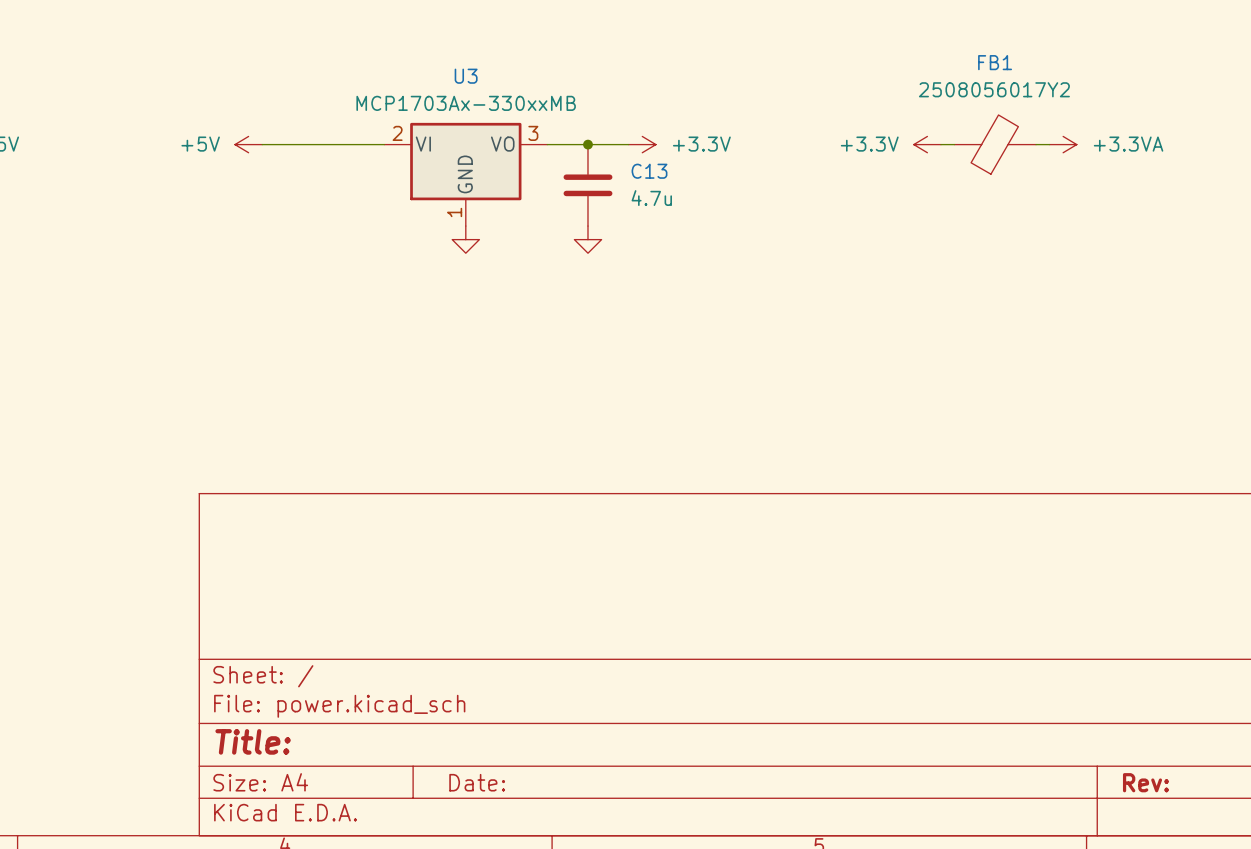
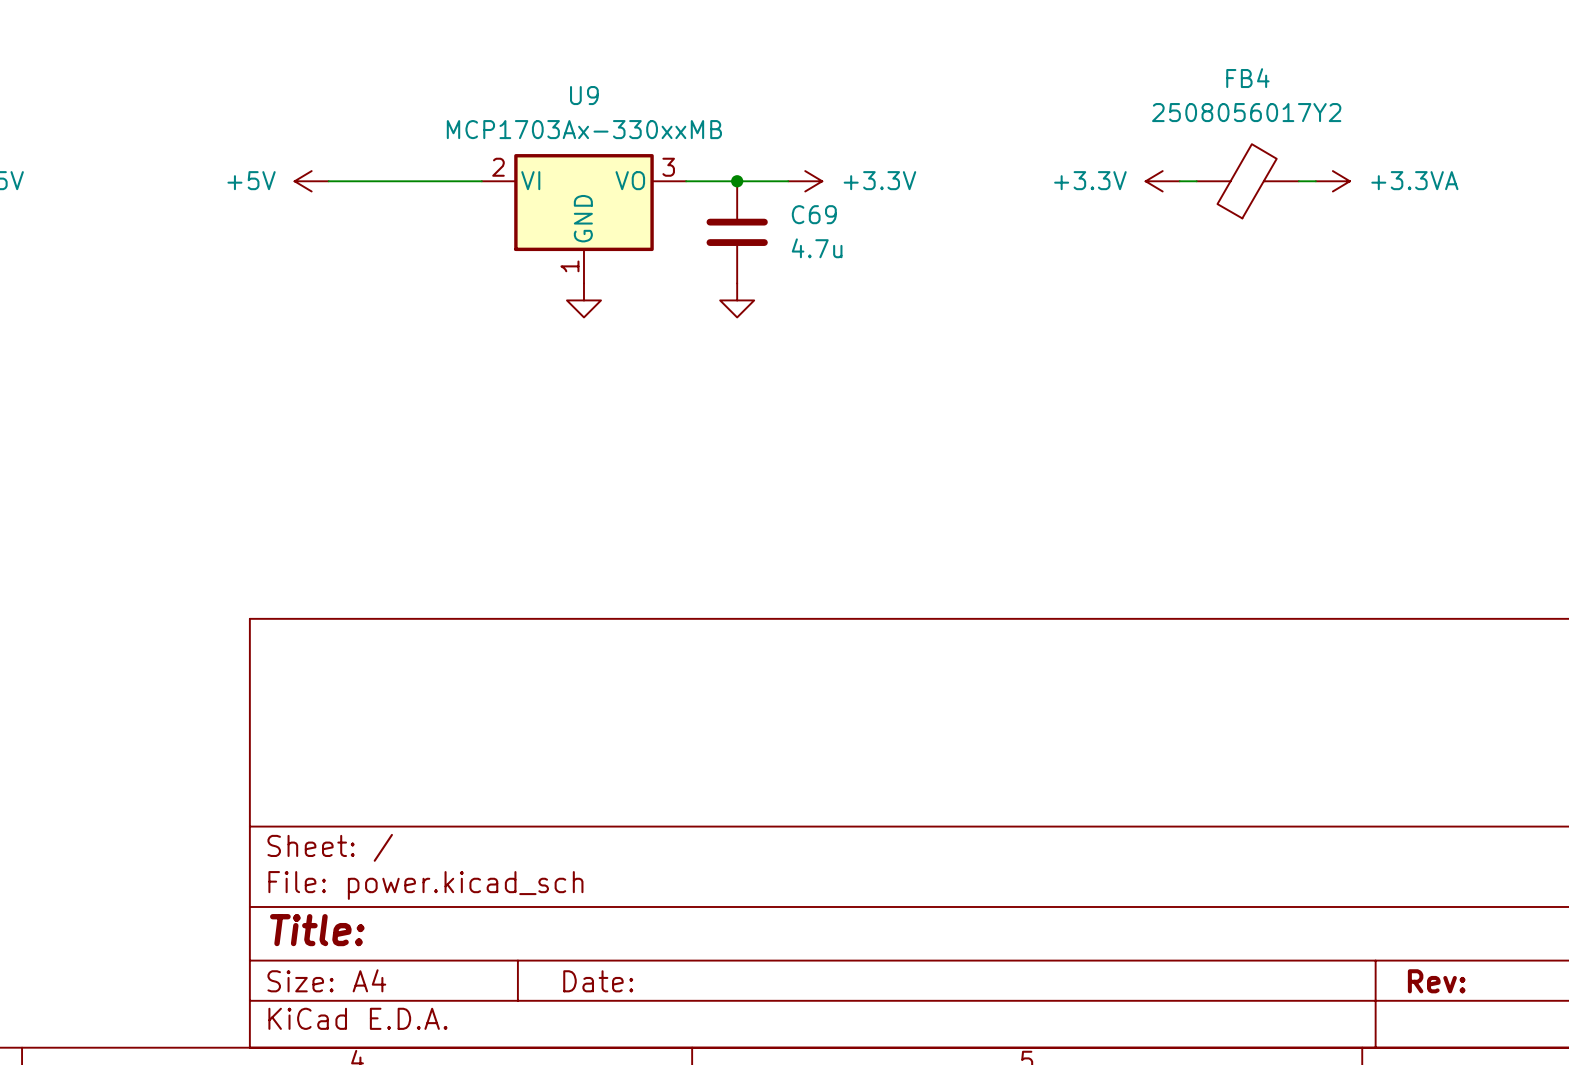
FB1 name: FB1 (995, 62) -> FB4 (1247, 78)
U3 name: U3 (466, 76) -> U9 (584, 95)
C13 name: C13 (649, 171) -> C69 (814, 214)

